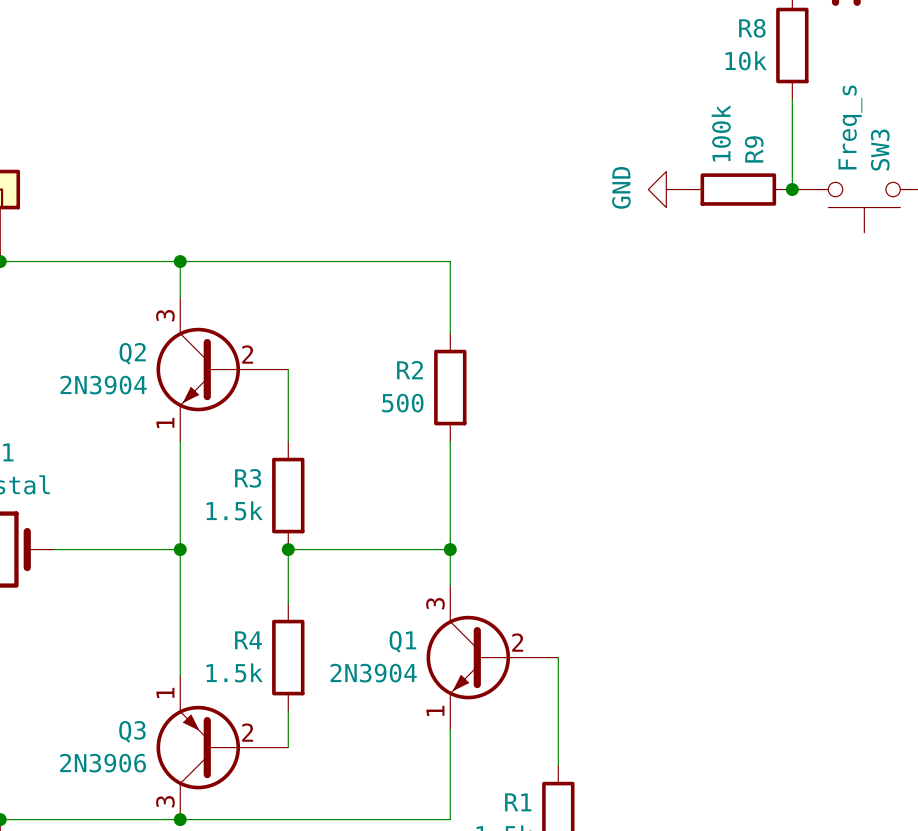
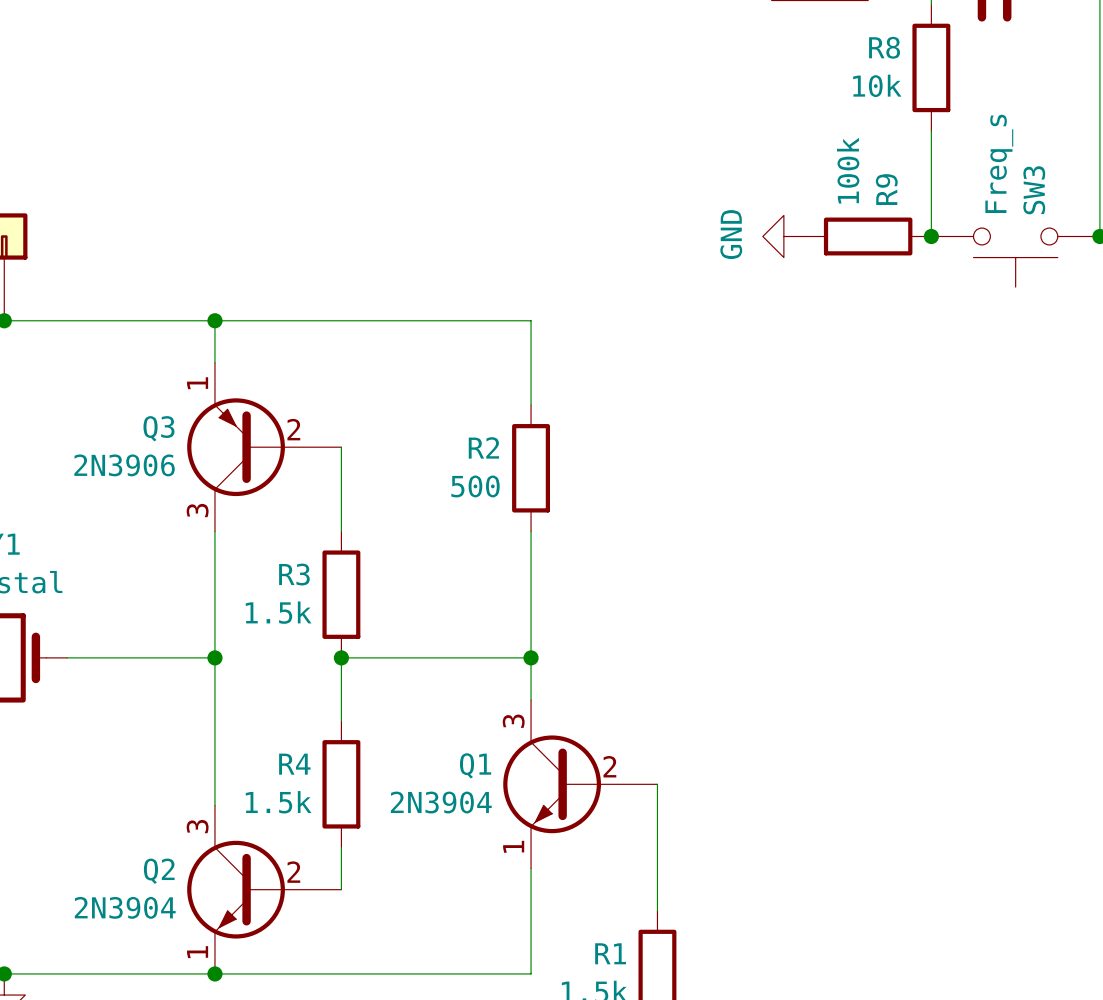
Q2 position: (222, 369) -> (264, 889)
Q3 position: (222, 747) -> (264, 447)

